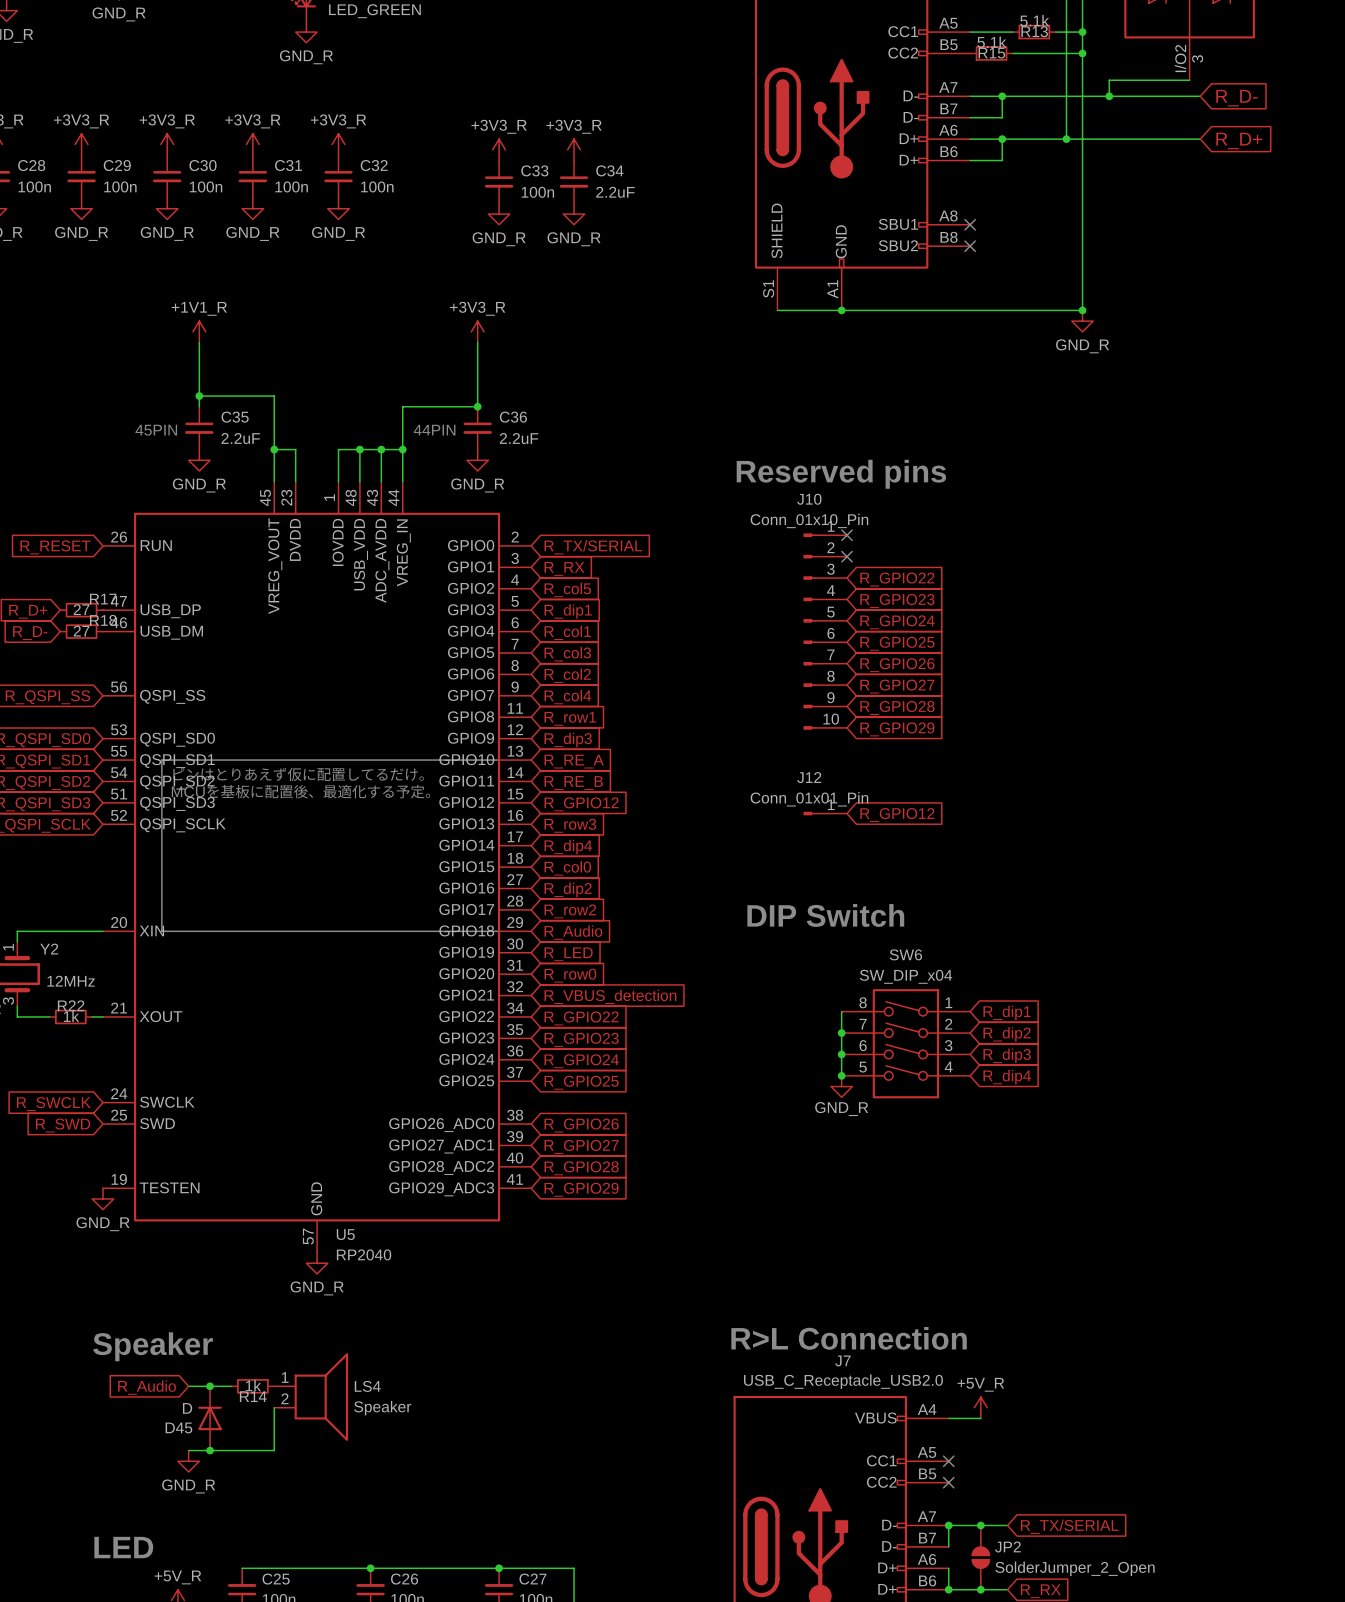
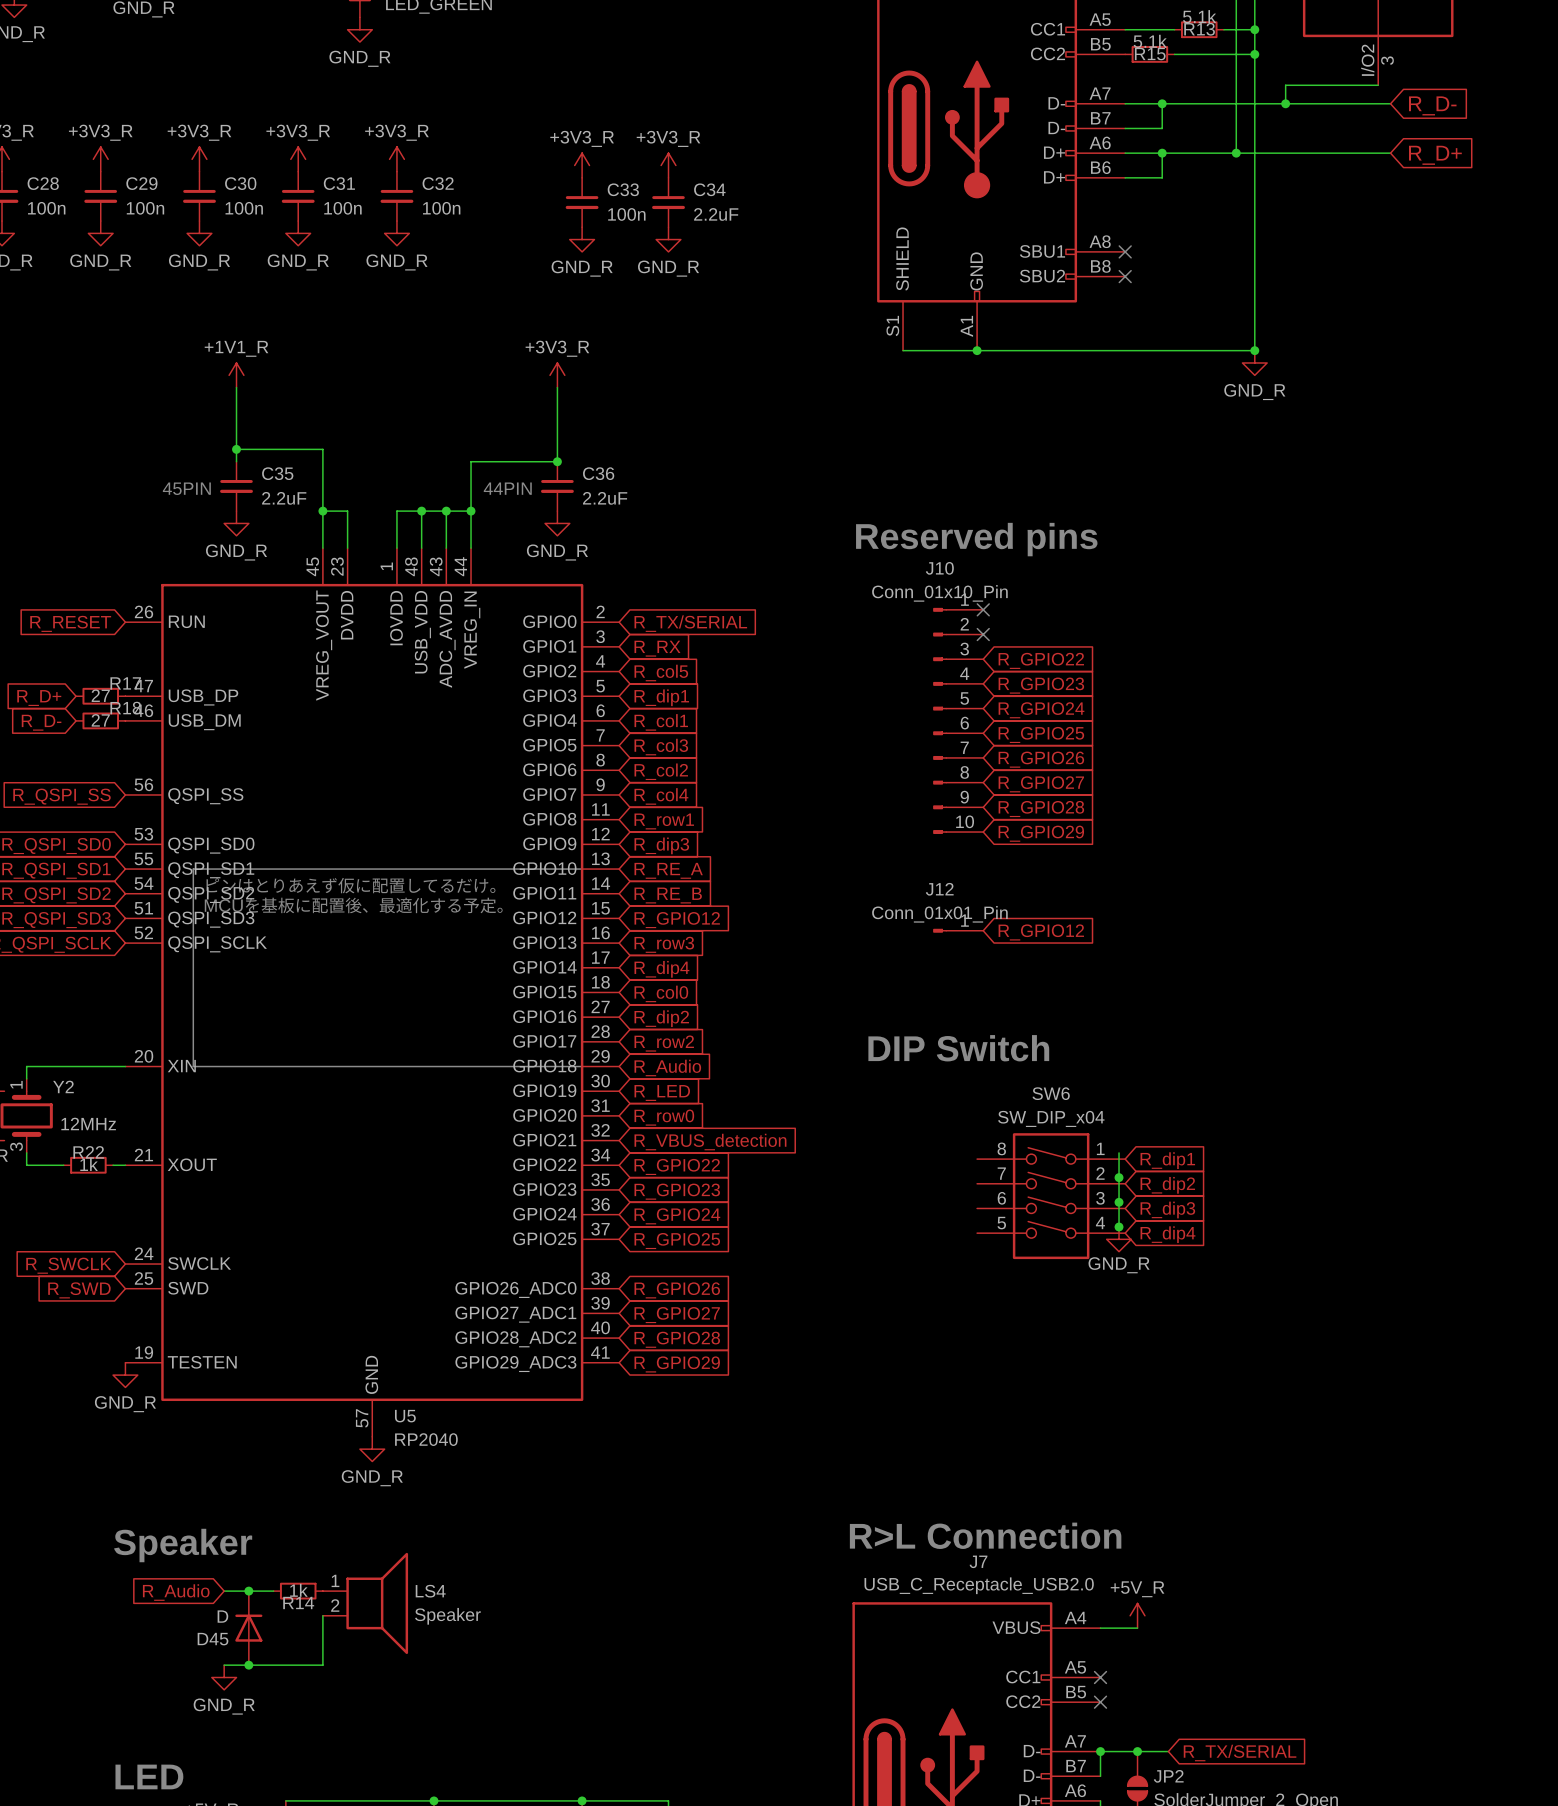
wire: (841, 1011) (841, 1075) -> (1119, 1152) (1119, 1226)
junction: none -> (1119, 1177)
junction: (841, 1033) -> none
junction: none -> (1119, 1202)
junction: (841, 1054) -> none
junction: none -> (1119, 1226)
junction: (841, 1075) -> none
power symbol position: GND_R (841, 1086) -> GND_R (1119, 1239)

